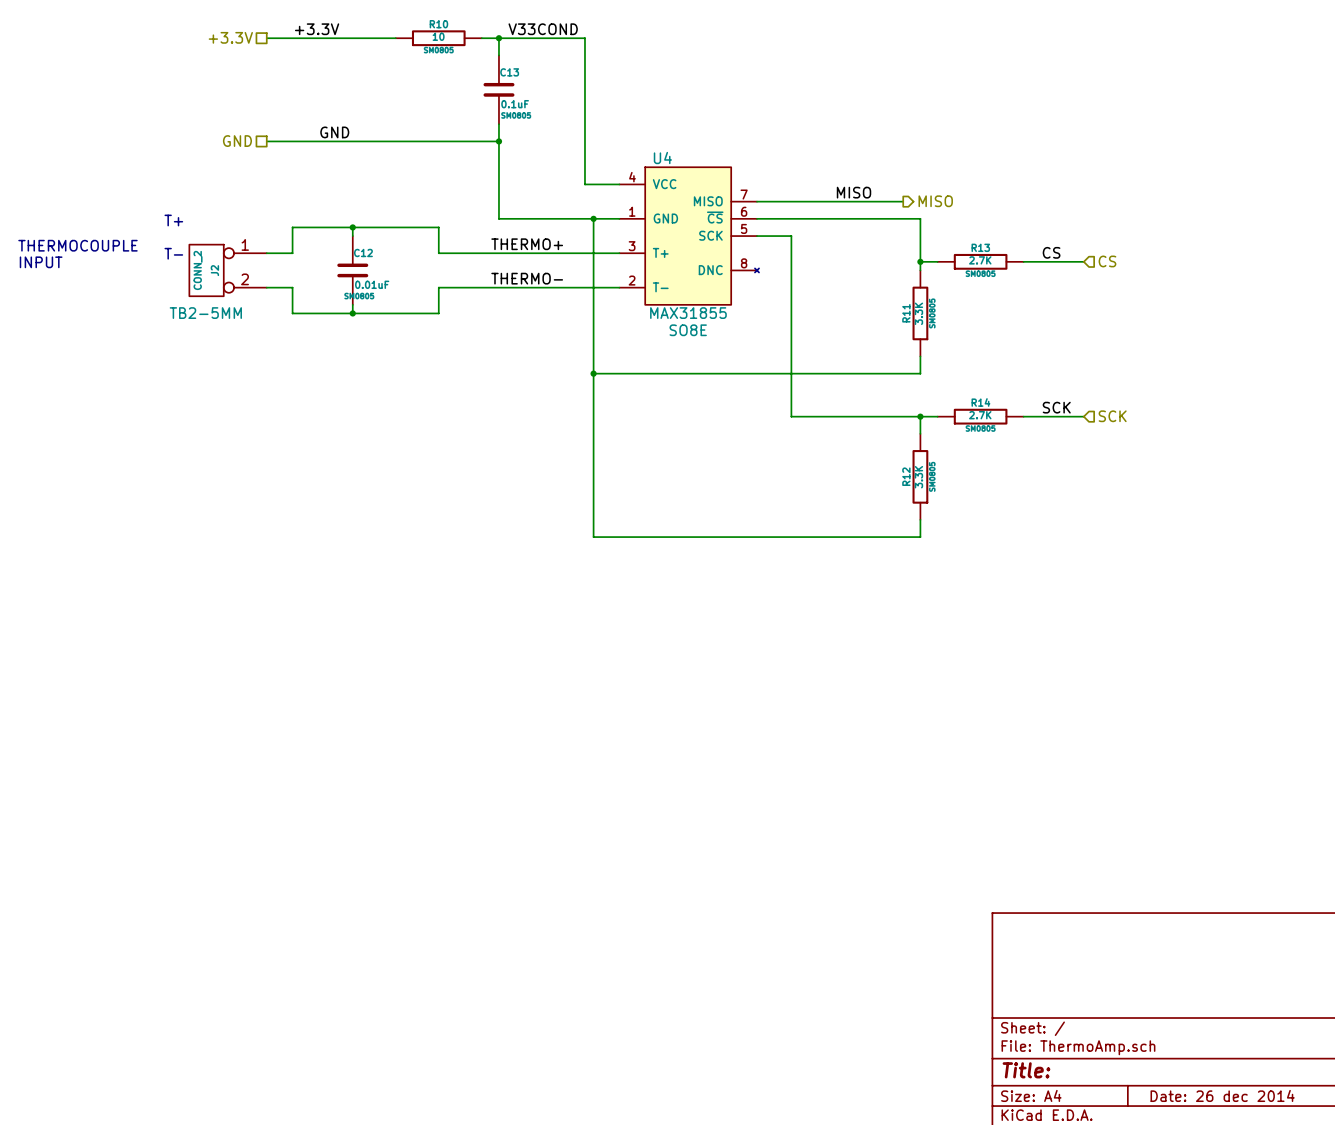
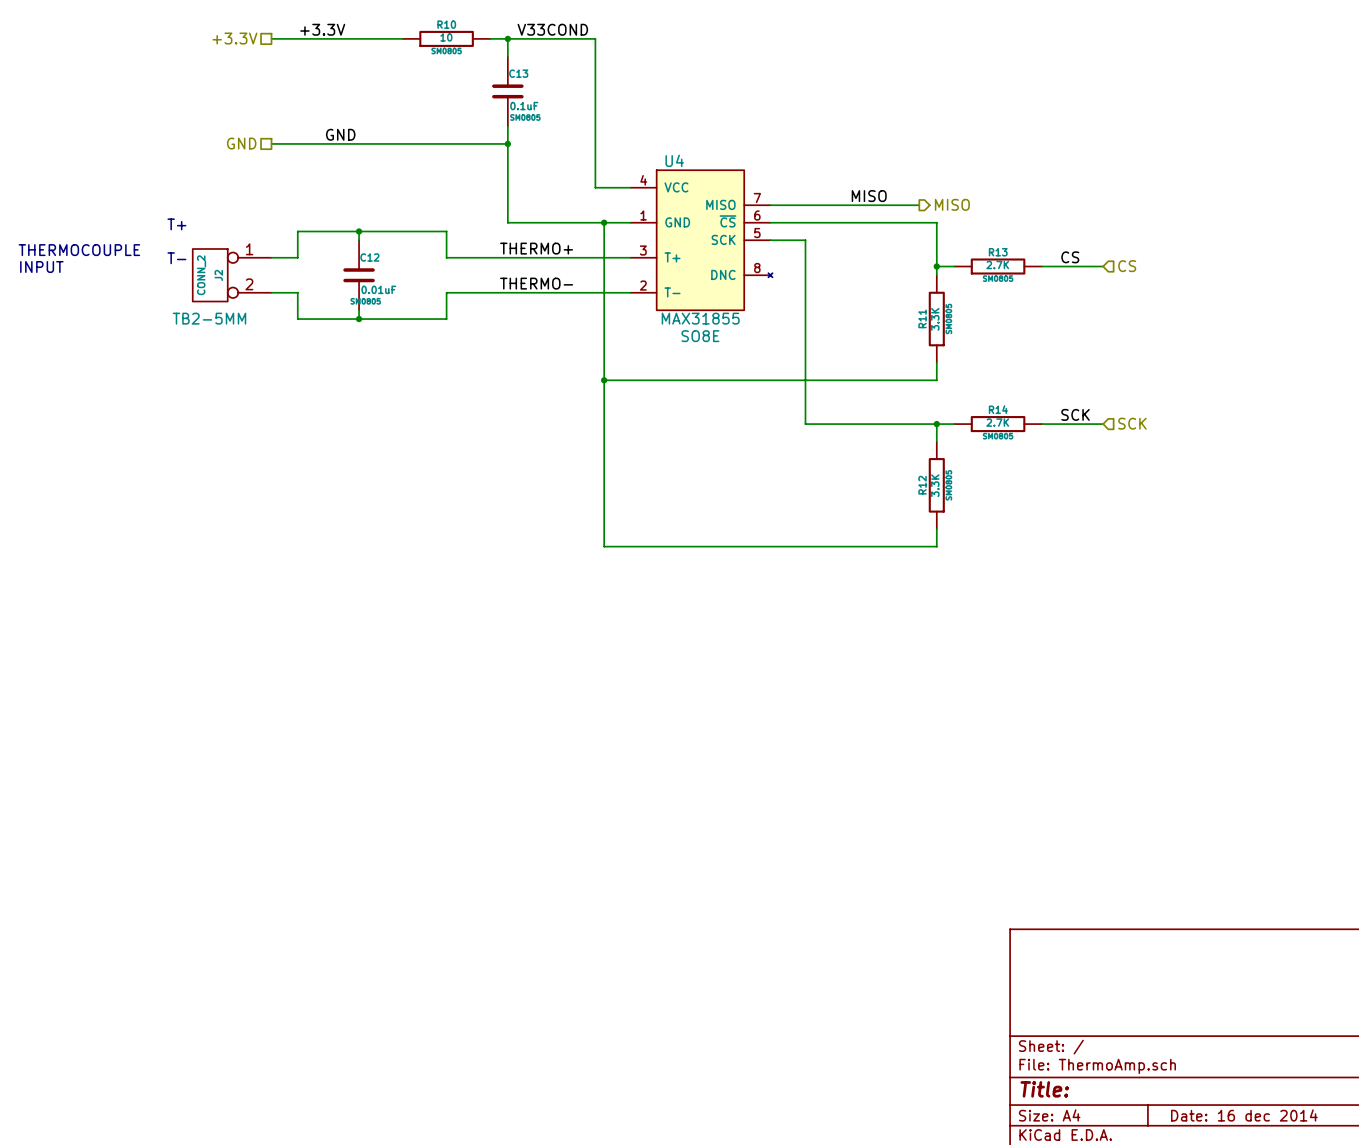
title block: Date: 26 dec 2014 (1222, 1095) -> Date: 16 dec 2014 (1244, 1115)

